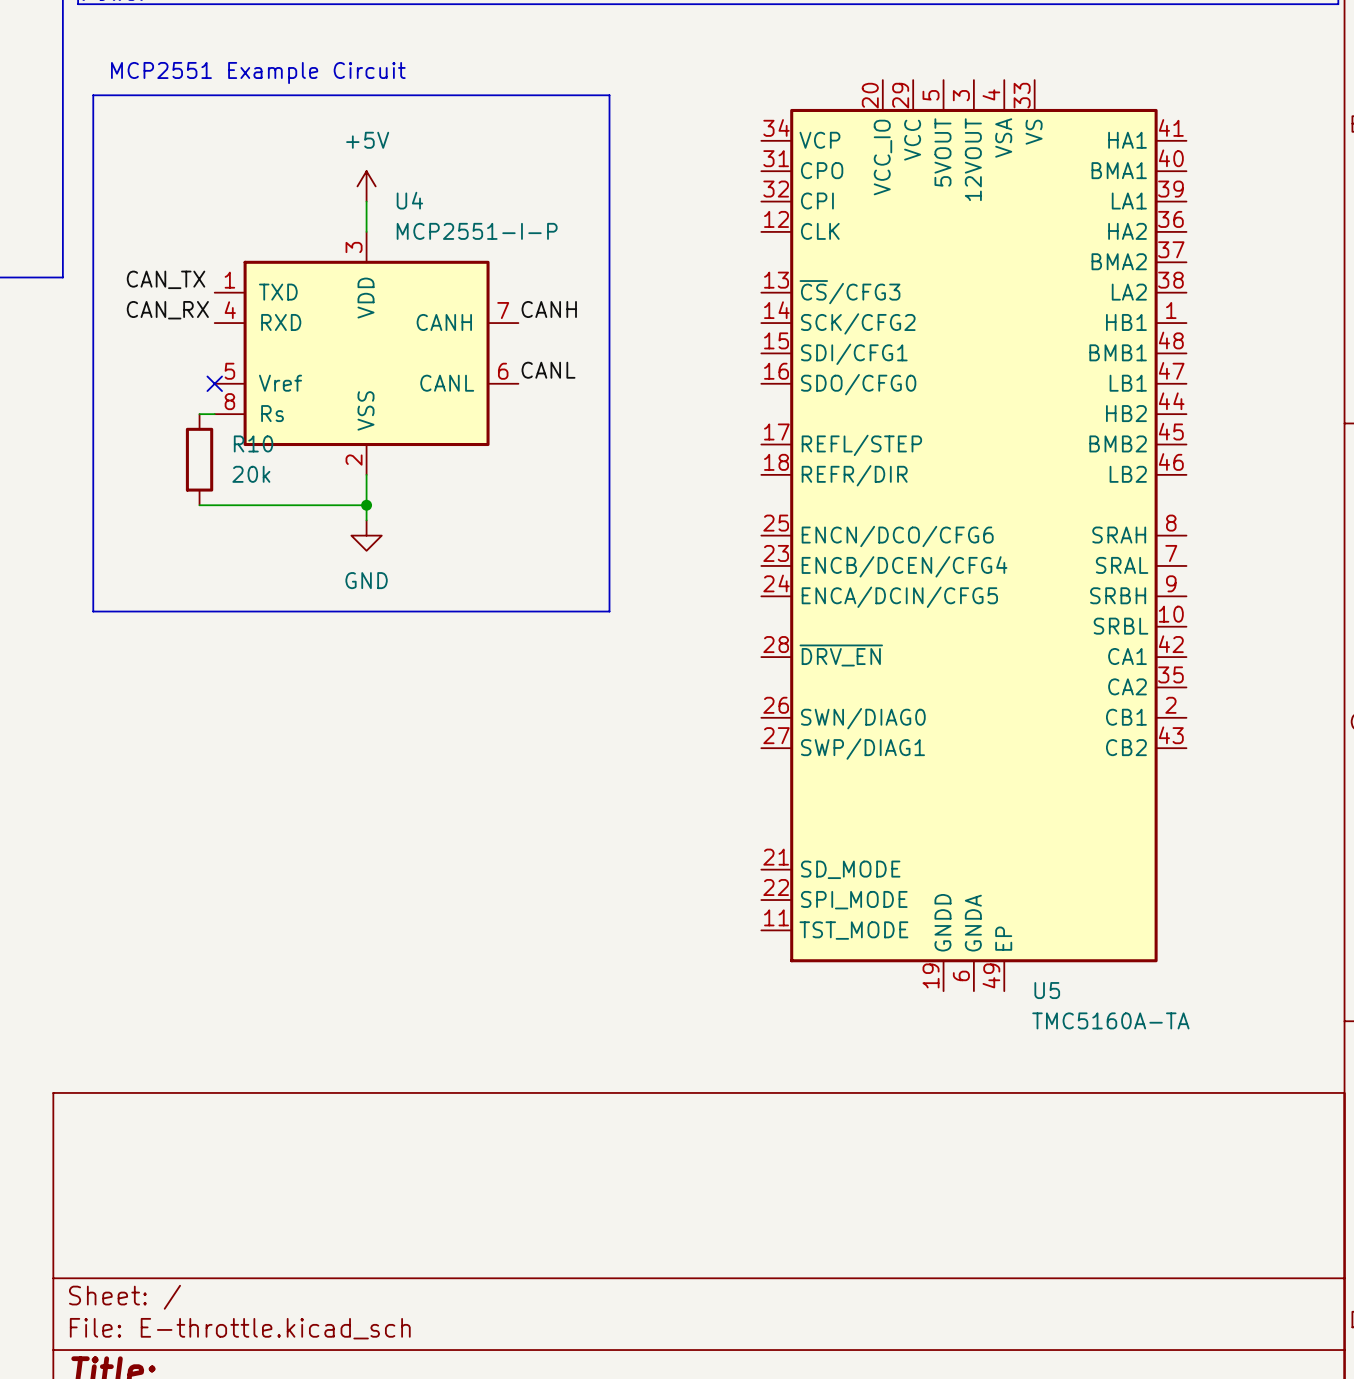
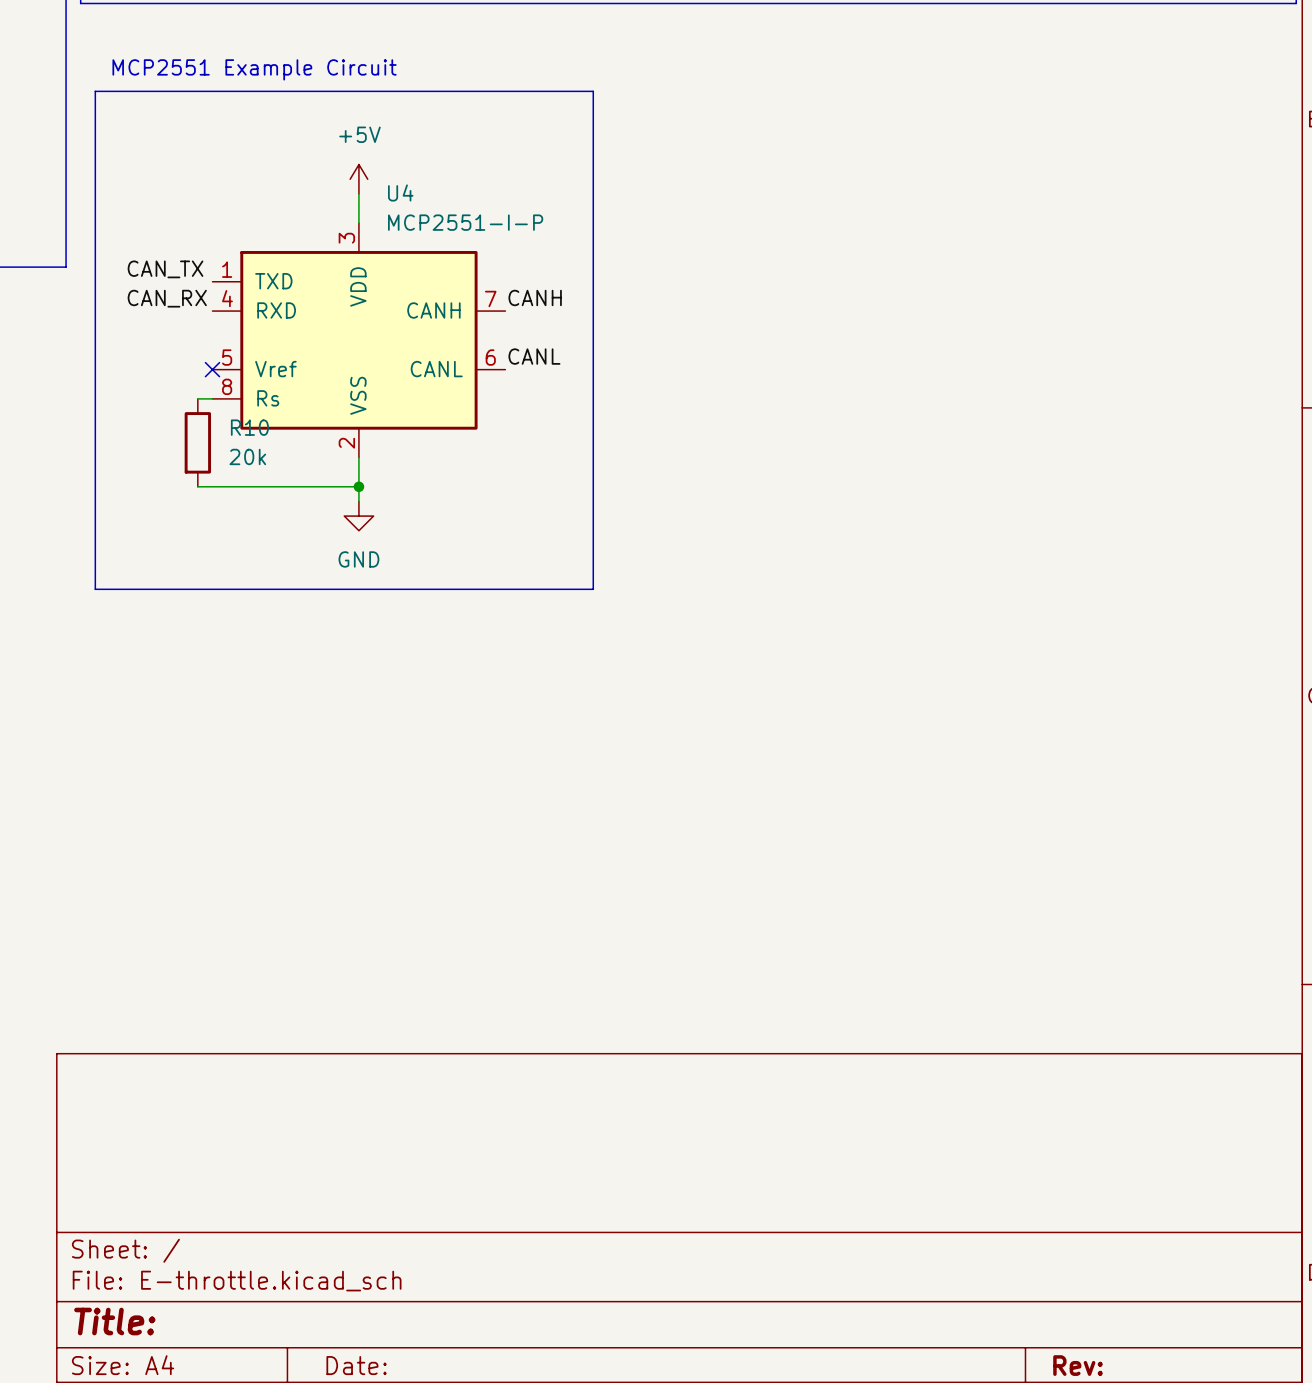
U5: TMC5160A-TA (973, 535) -> none

